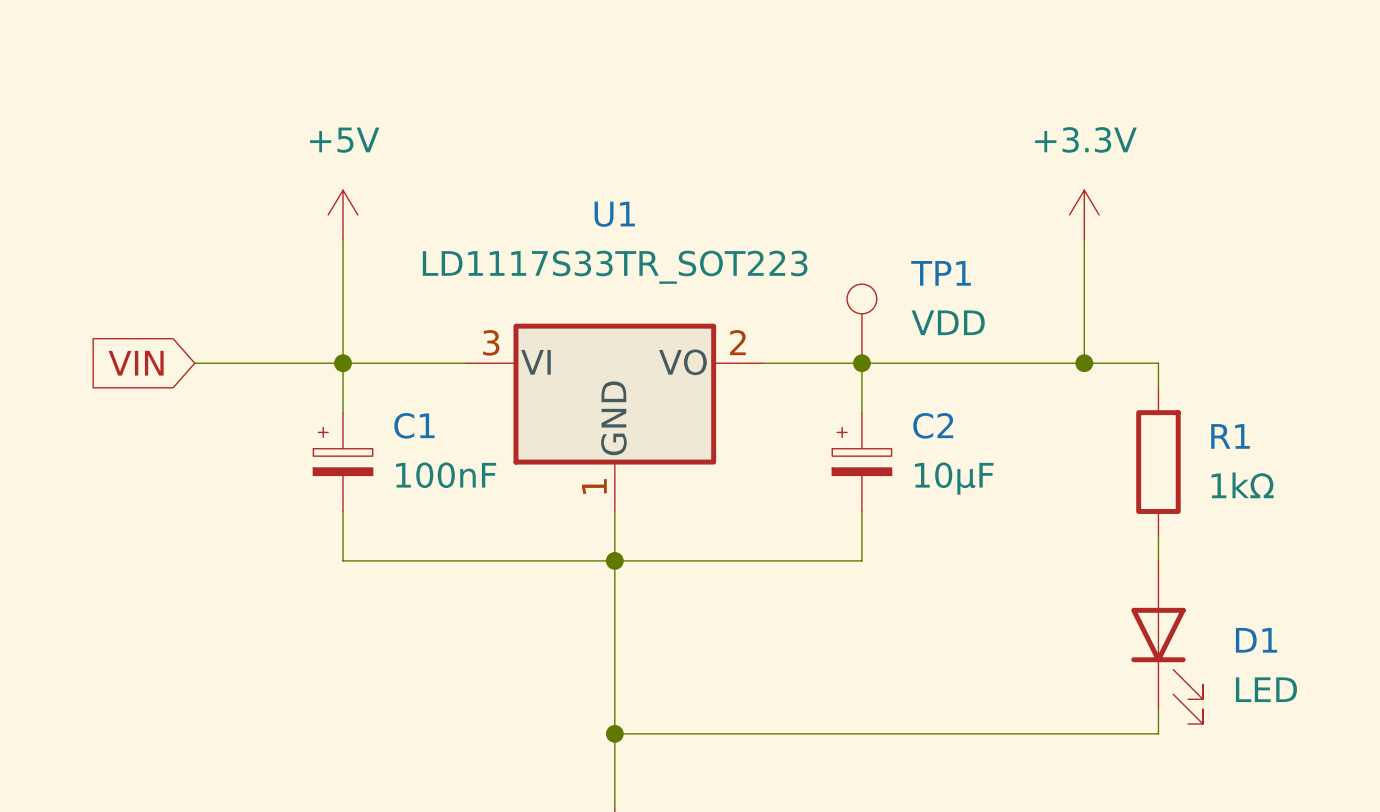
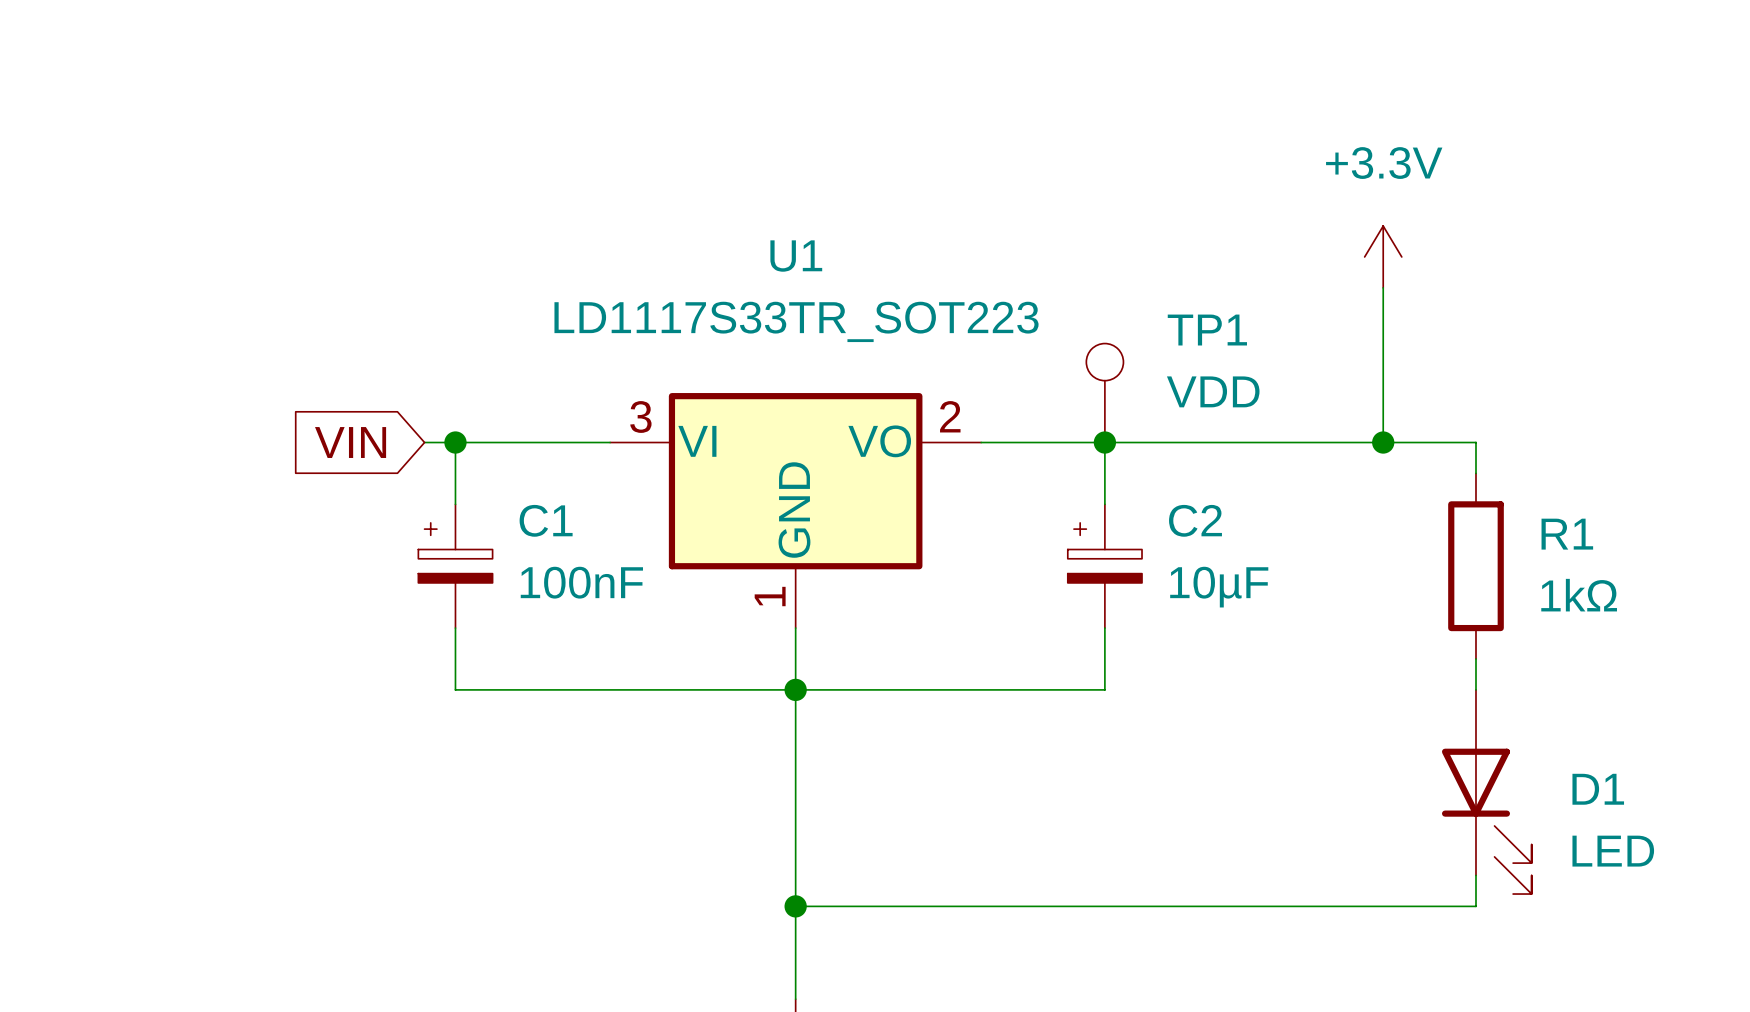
power symbol: +5V (343, 214) -> none
wire: (343, 239) (343, 363) -> none
global label position: VIN (136, 363) -> VIN (350, 442)
wire: (194, 363) (318, 363) -> none

